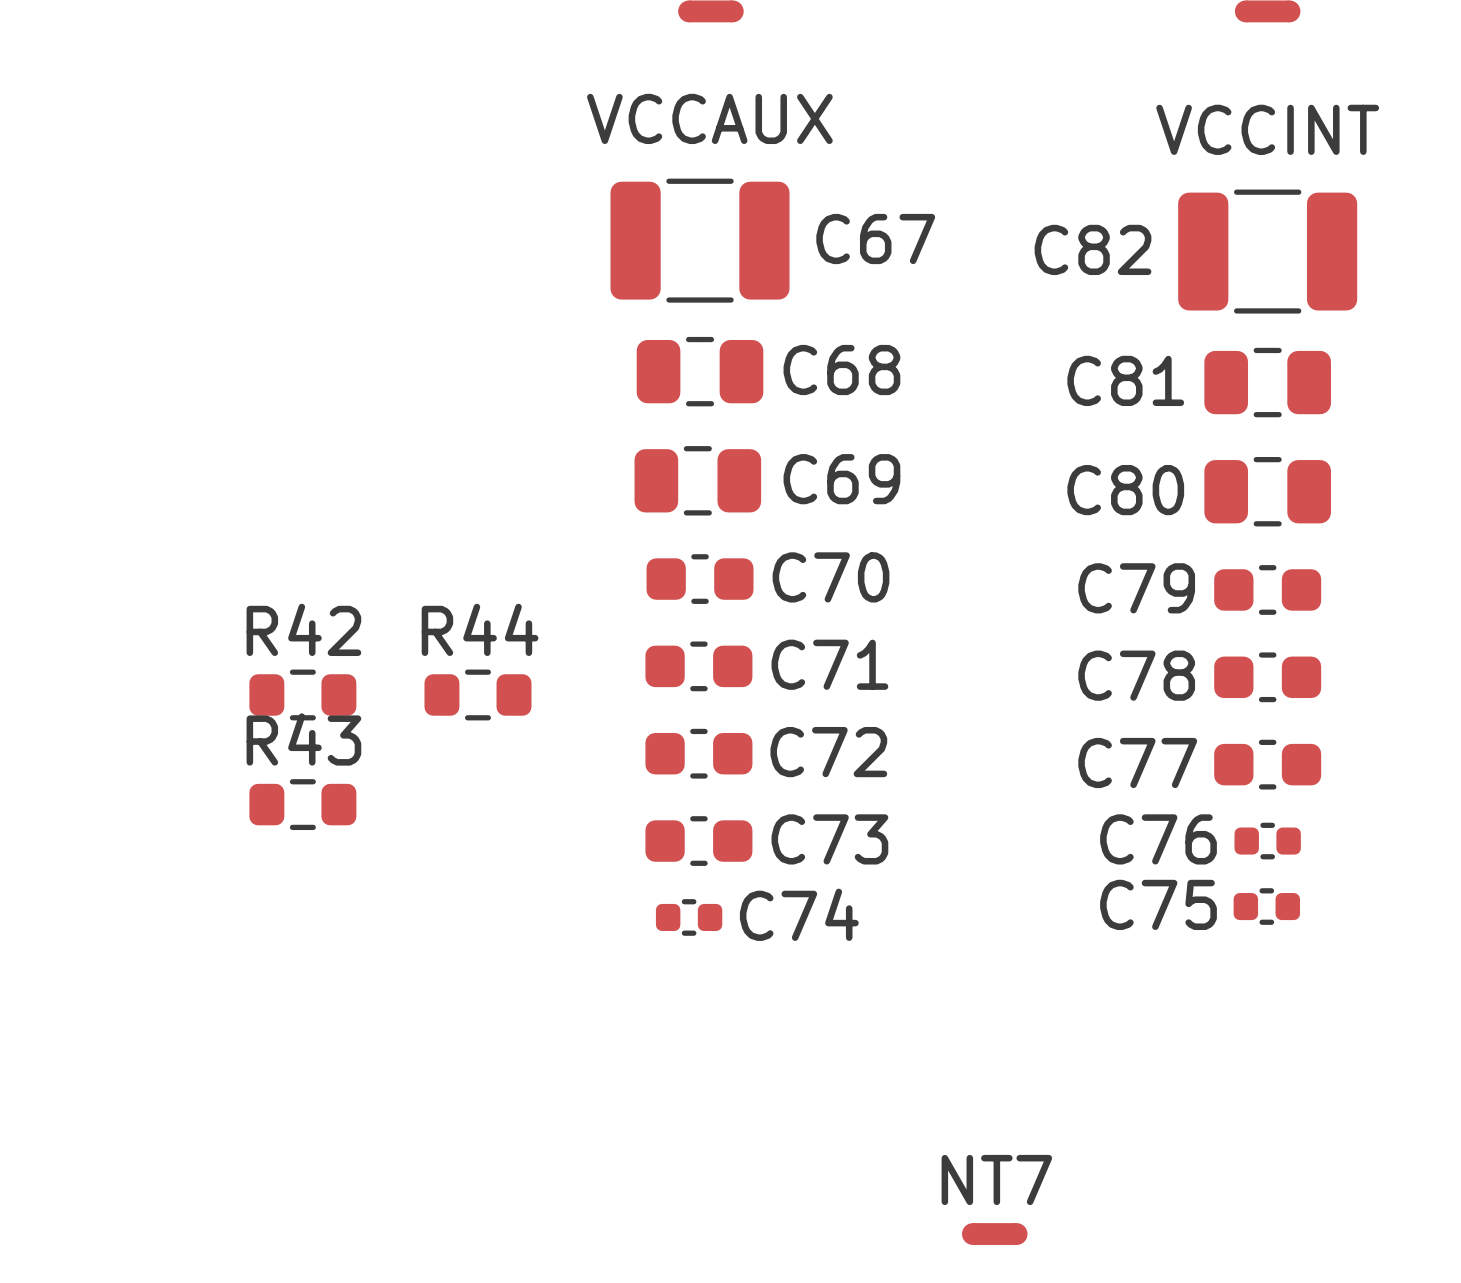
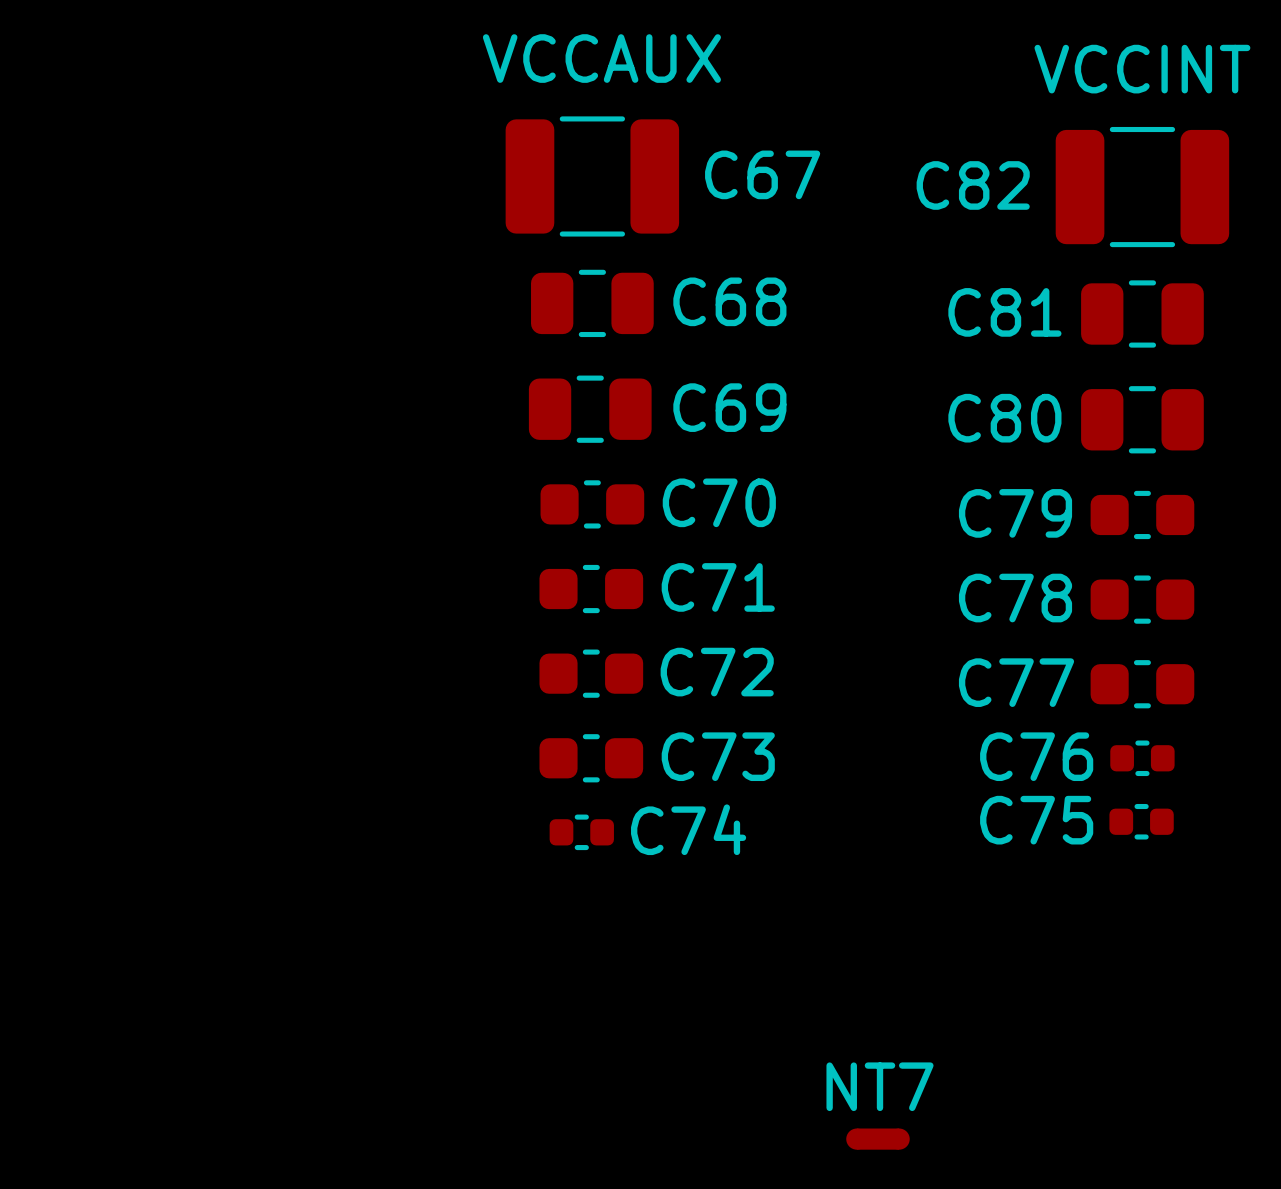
R42: (302, 694) -> none
R44: (477, 694) -> none
R43: (302, 804) -> none

